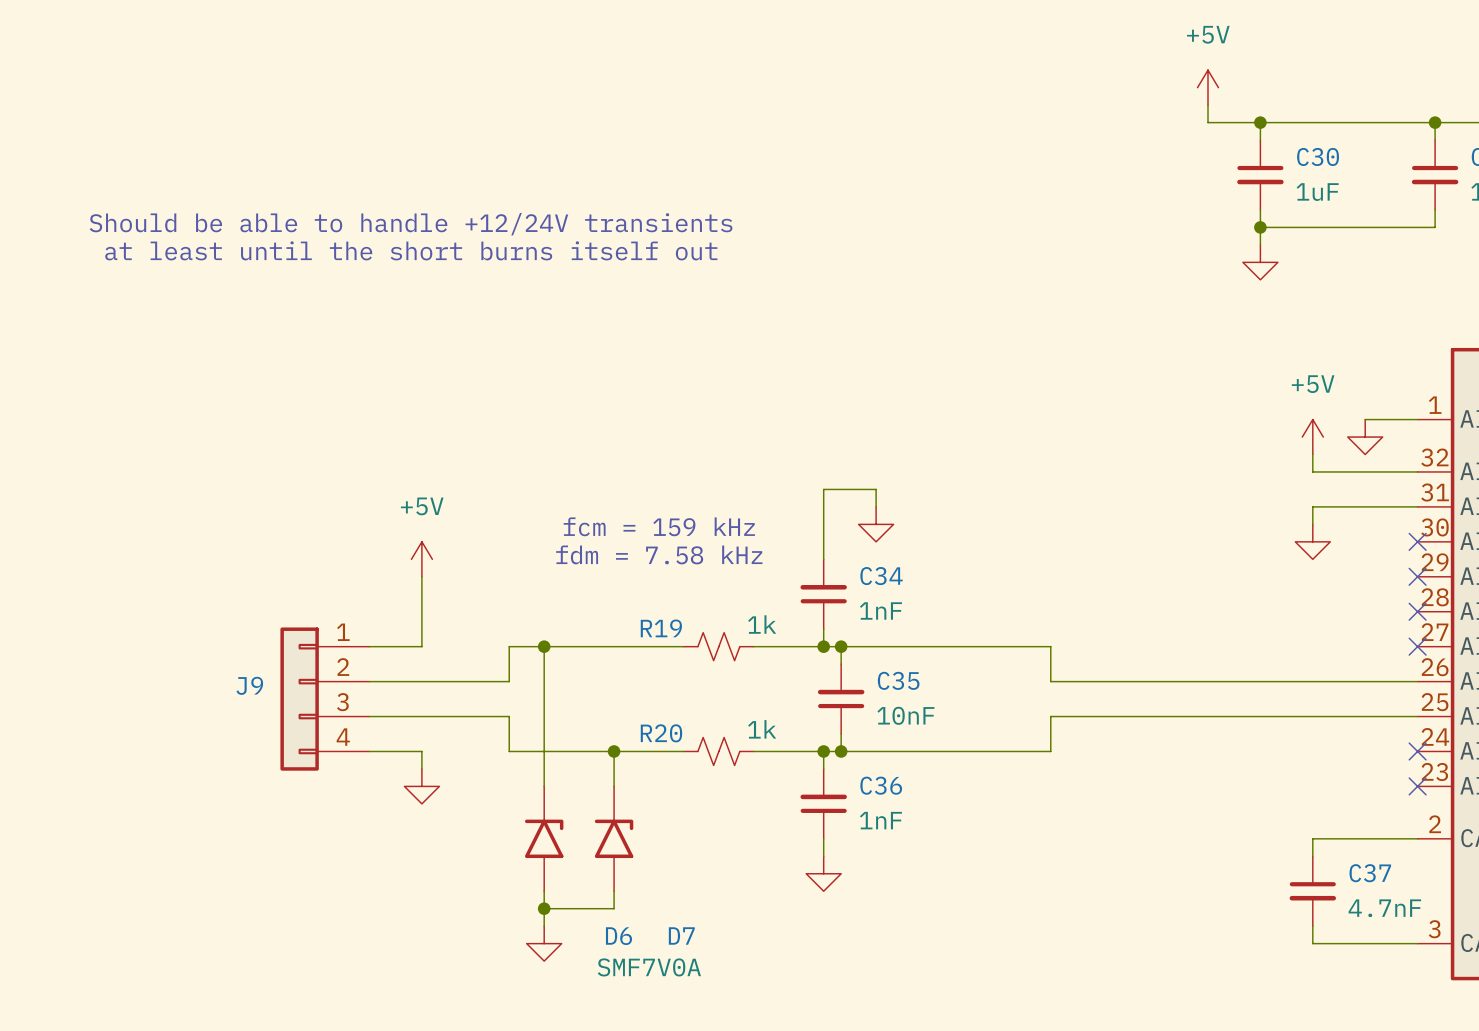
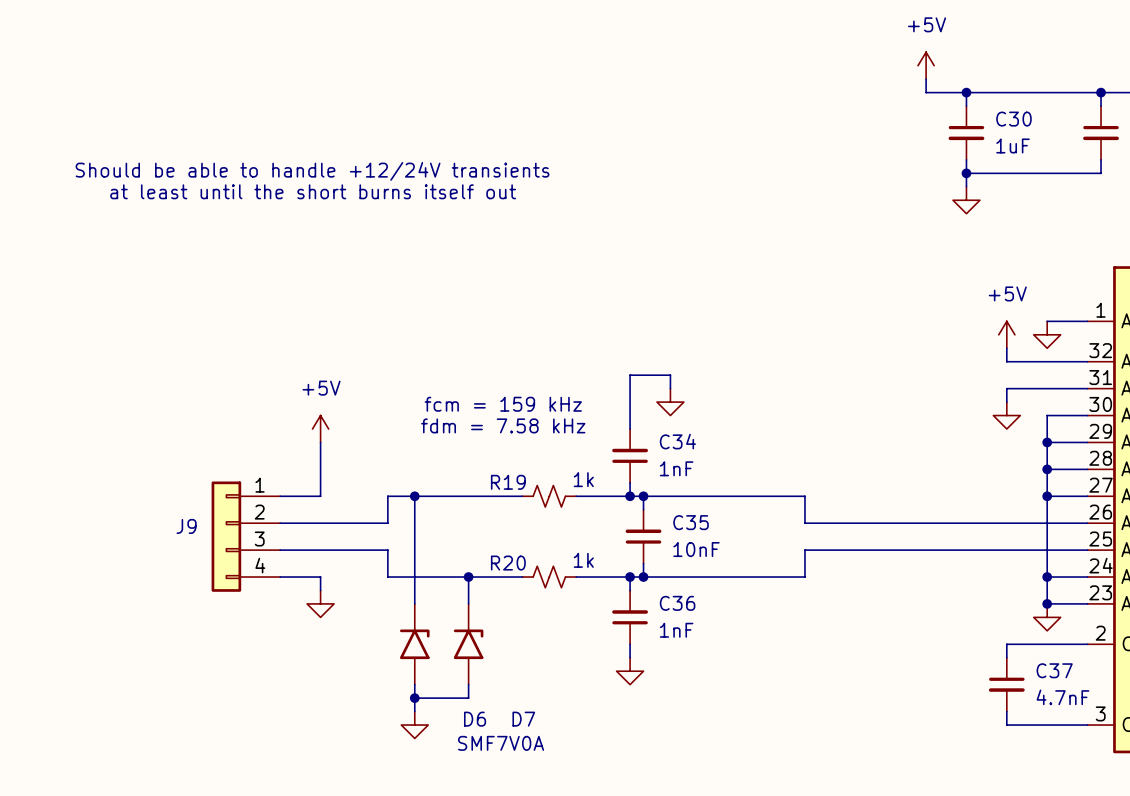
wire: none -> (1087, 415) (1047, 415) (1047, 603) (1087, 603)
no-connect mark: (1417, 541) -> none
wire: none -> (1047, 442) (1087, 442)
junction: none -> (1047, 442)
no-connect mark: (1417, 576) -> none
wire: none -> (1047, 469) (1087, 469)
junction: none -> (1047, 469)
no-connect mark: (1417, 611) -> none
wire: none -> (1047, 496) (1087, 496)
junction: none -> (1047, 496)
no-connect mark: (1417, 646) -> none
wire: none -> (1047, 577) (1087, 577)
junction: none -> (1047, 577)
no-connect mark: (1417, 751) -> none
junction: none -> (1047, 603)
no-connect mark: (1417, 786) -> none
power symbol: none -> (1047, 617)

